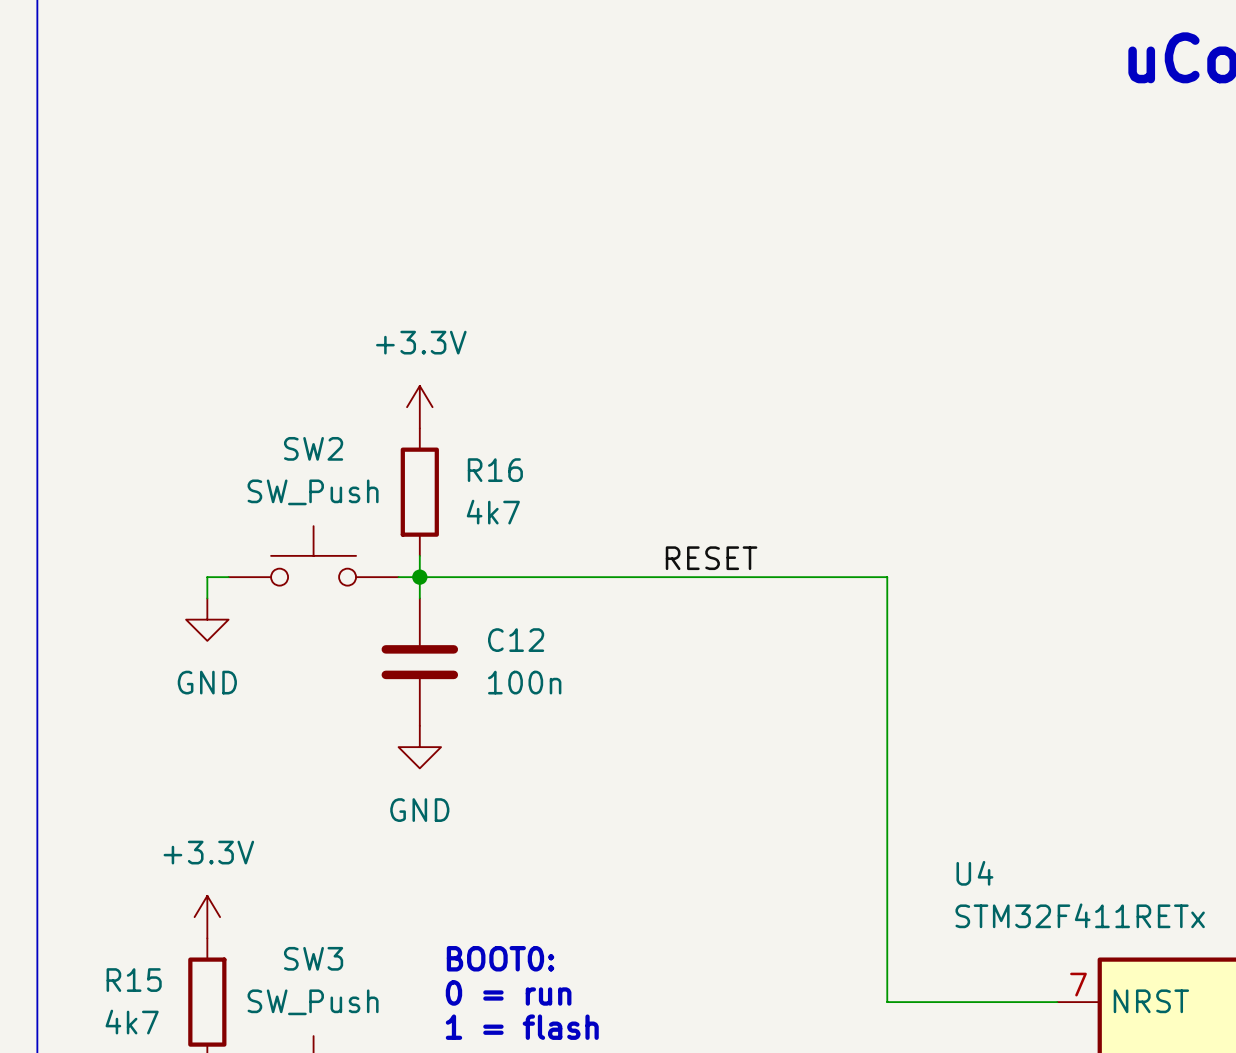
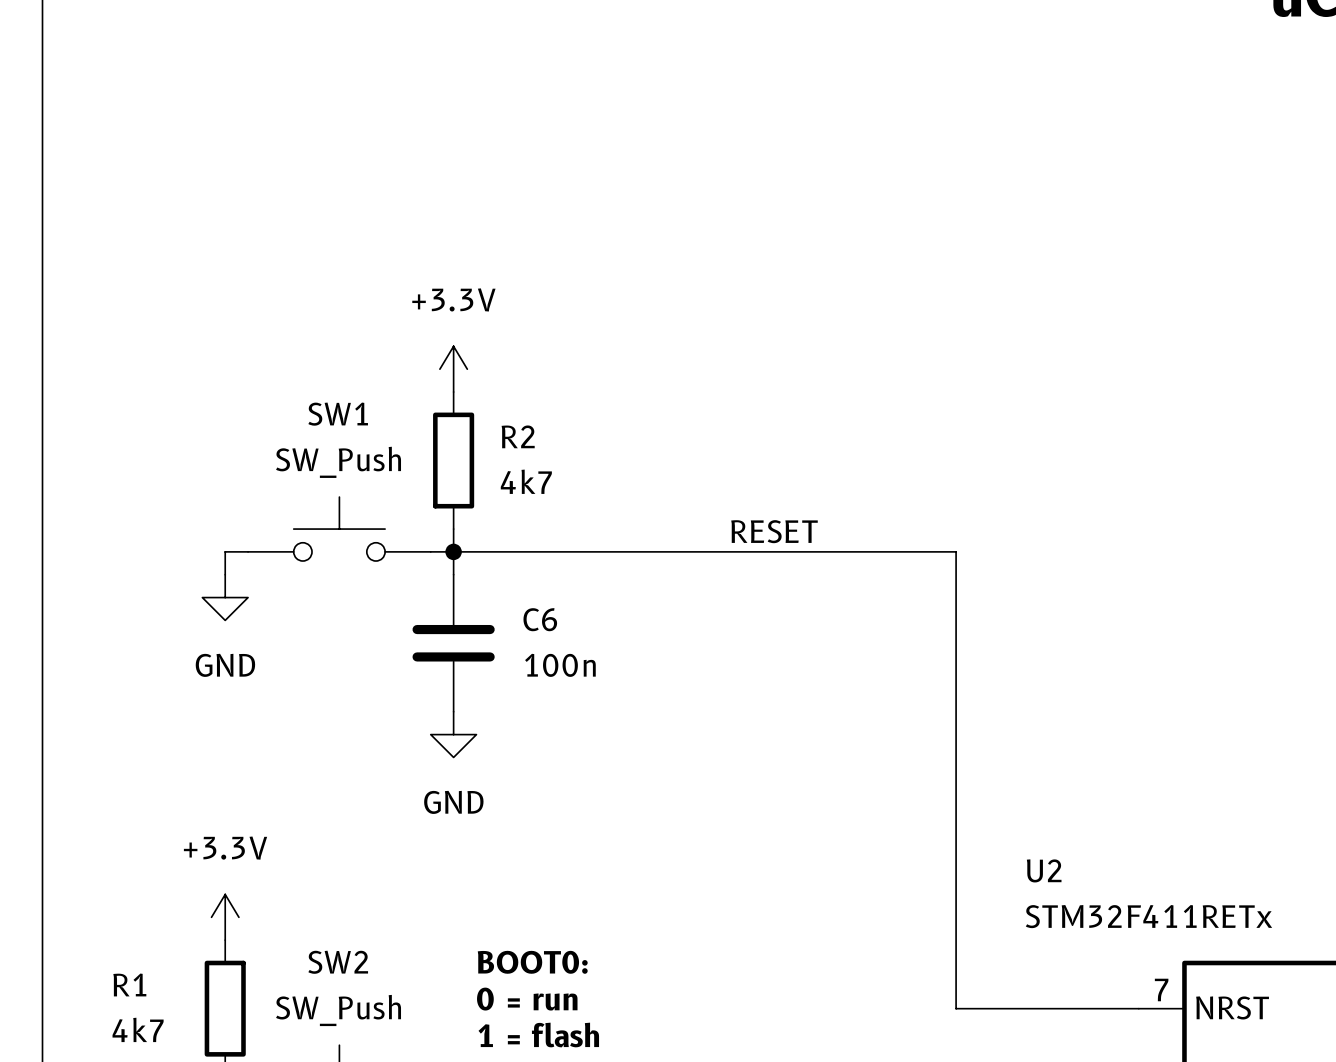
SW2 name: SW2 (313, 448) -> SW1 (338, 414)
R16 name: R16 (495, 470) -> R2 (518, 436)
C12 name: C12 (516, 640) -> C6 (540, 619)
U4 name: U4 (974, 873) -> U2 (1044, 870)
SW3 name: SW3 (313, 958) -> SW2 (338, 962)
R15 name: R15 (134, 980) -> R1 (129, 984)

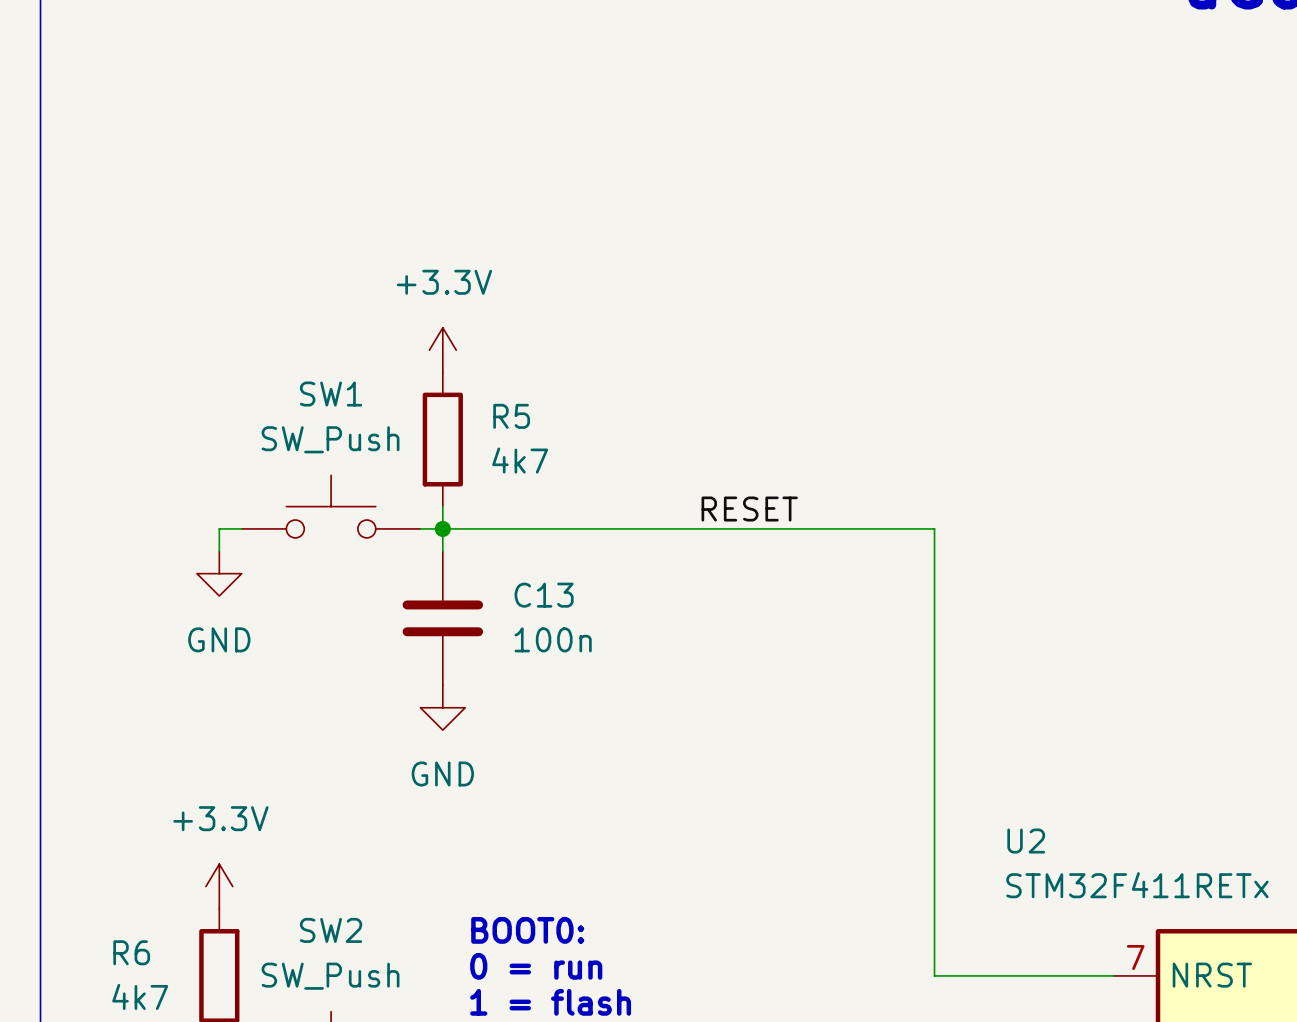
R2 name: R2 (518, 436) -> R5 (511, 416)
C6 name: C6 (540, 619) -> C13 (544, 595)
R1 name: R1 (129, 984) -> R6 (131, 952)

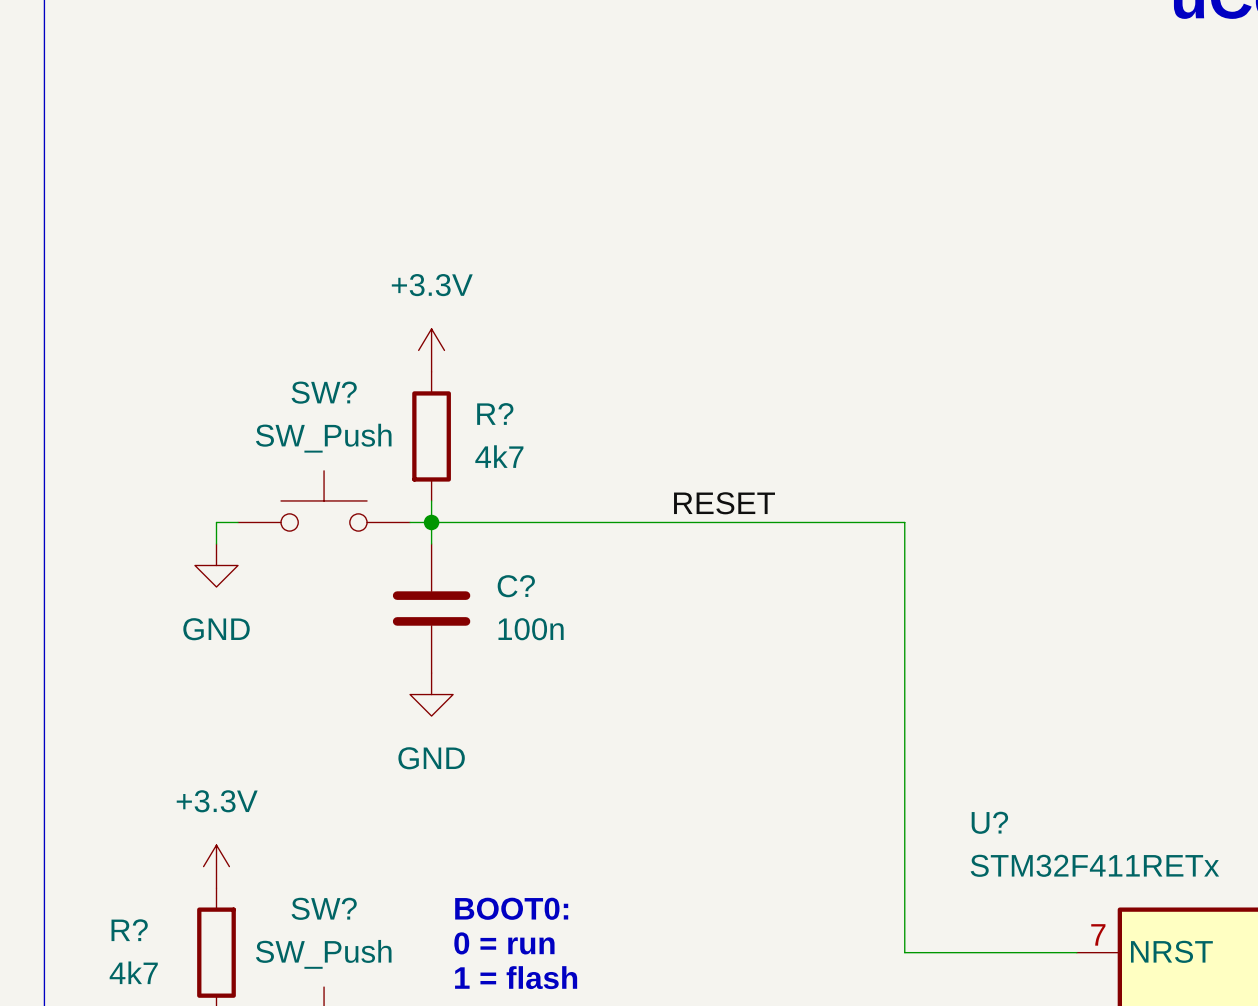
SW1 name: SW1 (331, 394) -> SW? (324, 392)
R5 name: R5 (511, 416) -> R? (495, 413)
C13 name: C13 (544, 595) -> C? (516, 586)
U2 name: U2 (1026, 841) -> U? (989, 822)
SW2 name: SW2 (331, 930) -> SW? (324, 908)
R6 name: R6 (131, 952) -> R? (129, 930)

